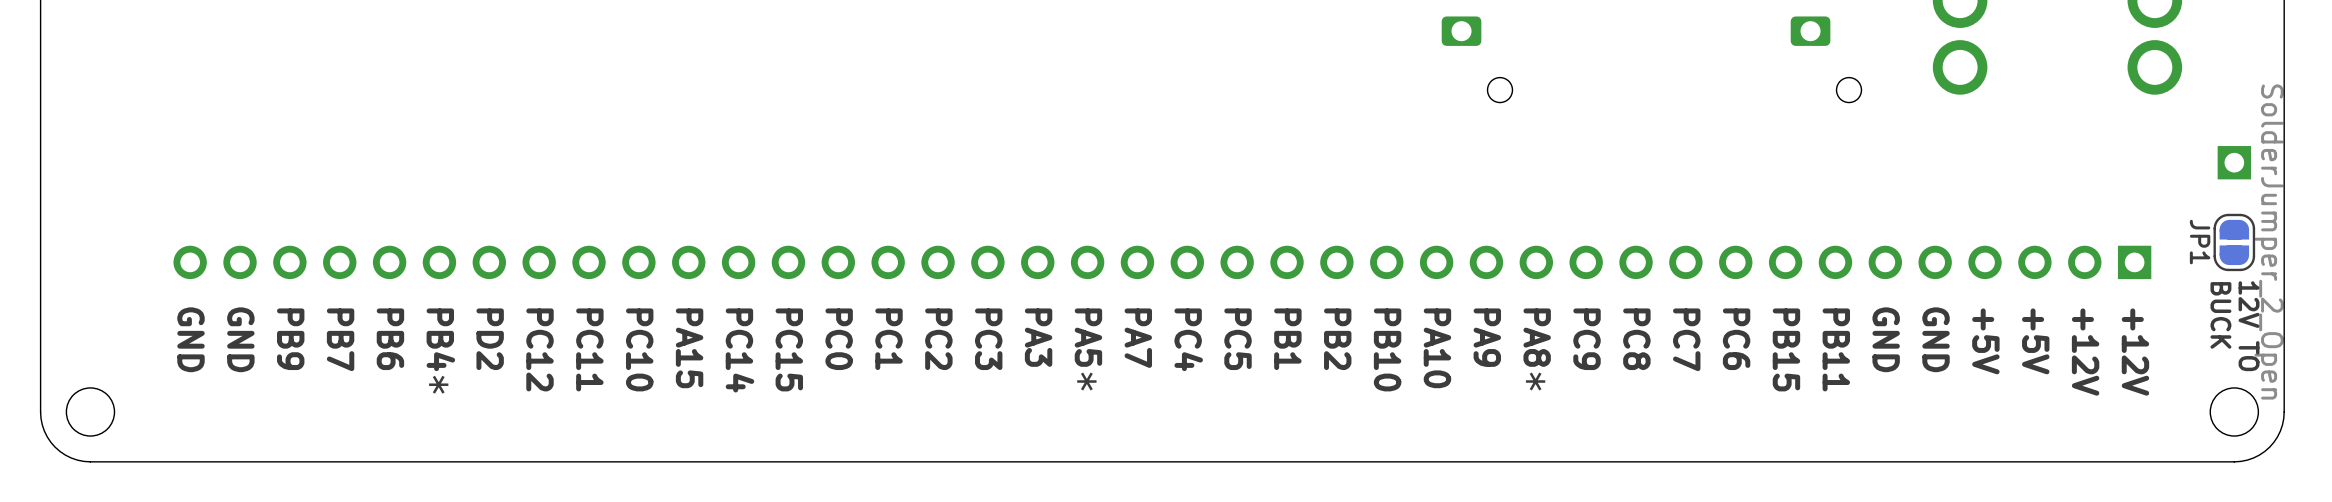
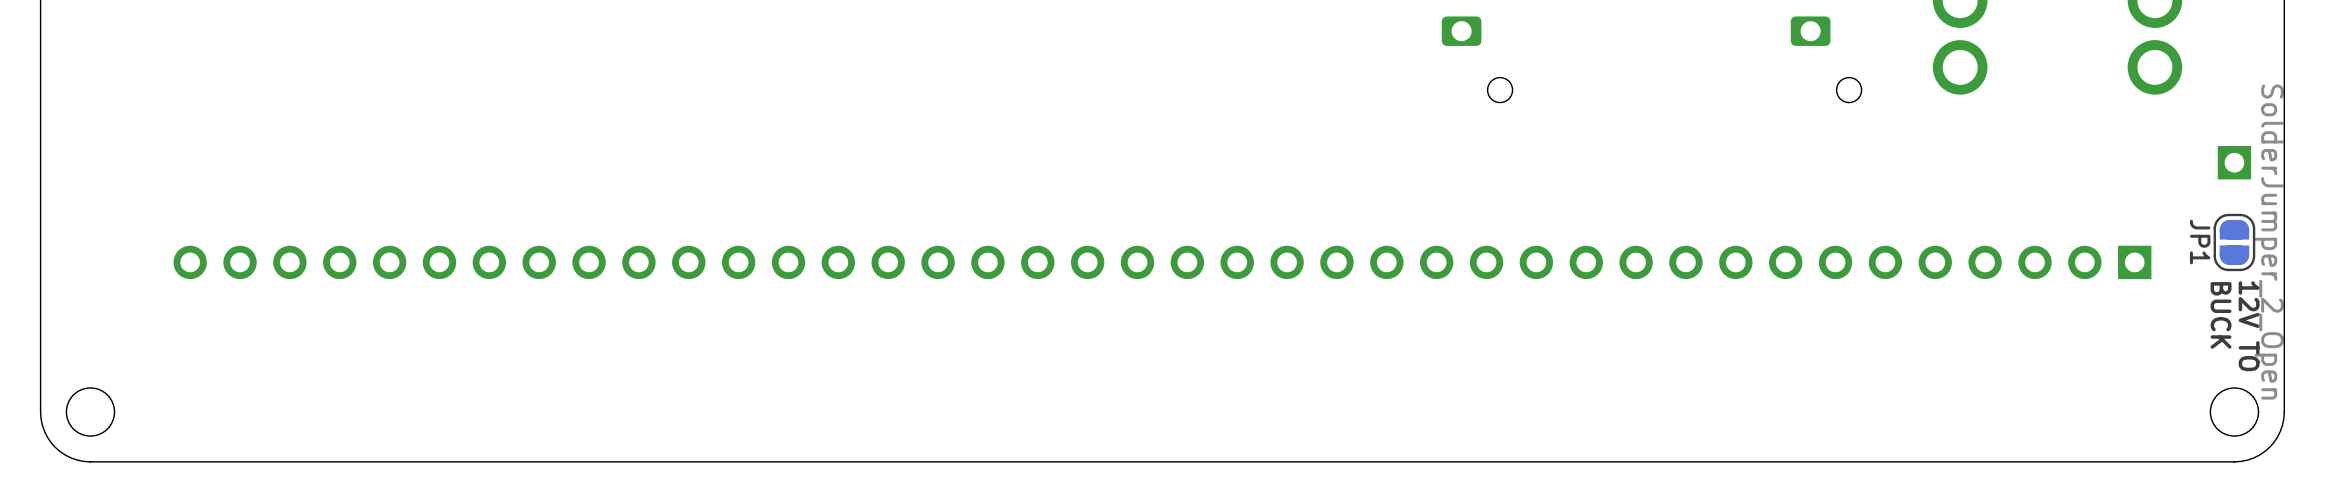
text: PA3 (1038, 337) -> none
text: PA9 (1487, 337) -> none
text: PA7 (1138, 338) -> none
text: GND (191, 339) -> none
text: GND (240, 339) -> none
text: PB9 (290, 339) -> none
text: PB7 (340, 339) -> none
text: PB6 (390, 339) -> none
text: PD2 (490, 339) -> none
text: PC0 (839, 339) -> none
text: PC1 (889, 339) -> none
text: PC2 (938, 339) -> none
text: PC3 (988, 339) -> none
text: PC4 (1188, 339) -> none
text: PC5 (1238, 339) -> none
text: PB1 (1287, 339) -> none
text: PB2 (1337, 339) -> none
text: PC9 (1587, 339) -> none
text: PC8 (1636, 339) -> none
text: PC7 (1686, 339) -> none
text: PC6 (1736, 339) -> none
text: GND (1886, 339) -> none
text: GND (1936, 339) -> none
text: +5V (1985, 341) -> none
text: +5V (2035, 341) -> none
text: PA15 (689, 348) -> none
text: PA10 (1437, 348) -> none
text: PC12 (540, 349) -> none
text: PC11 (589, 349) -> none
text: PC10 (639, 349) -> none
text: PC15 (789, 349) -> none
text: PB10 (1387, 349) -> none
text: PB15 (1786, 349) -> none
text: PB11 (1836, 349) -> none
text: PC14 (739, 350) -> none
text: PA5∗ (1088, 350) -> none
text: PA8∗ (1537, 350) -> none
text: PB4∗ (440, 352) -> none
text: +12V (2085, 352) -> none
text: +12V (2135, 352) -> none

